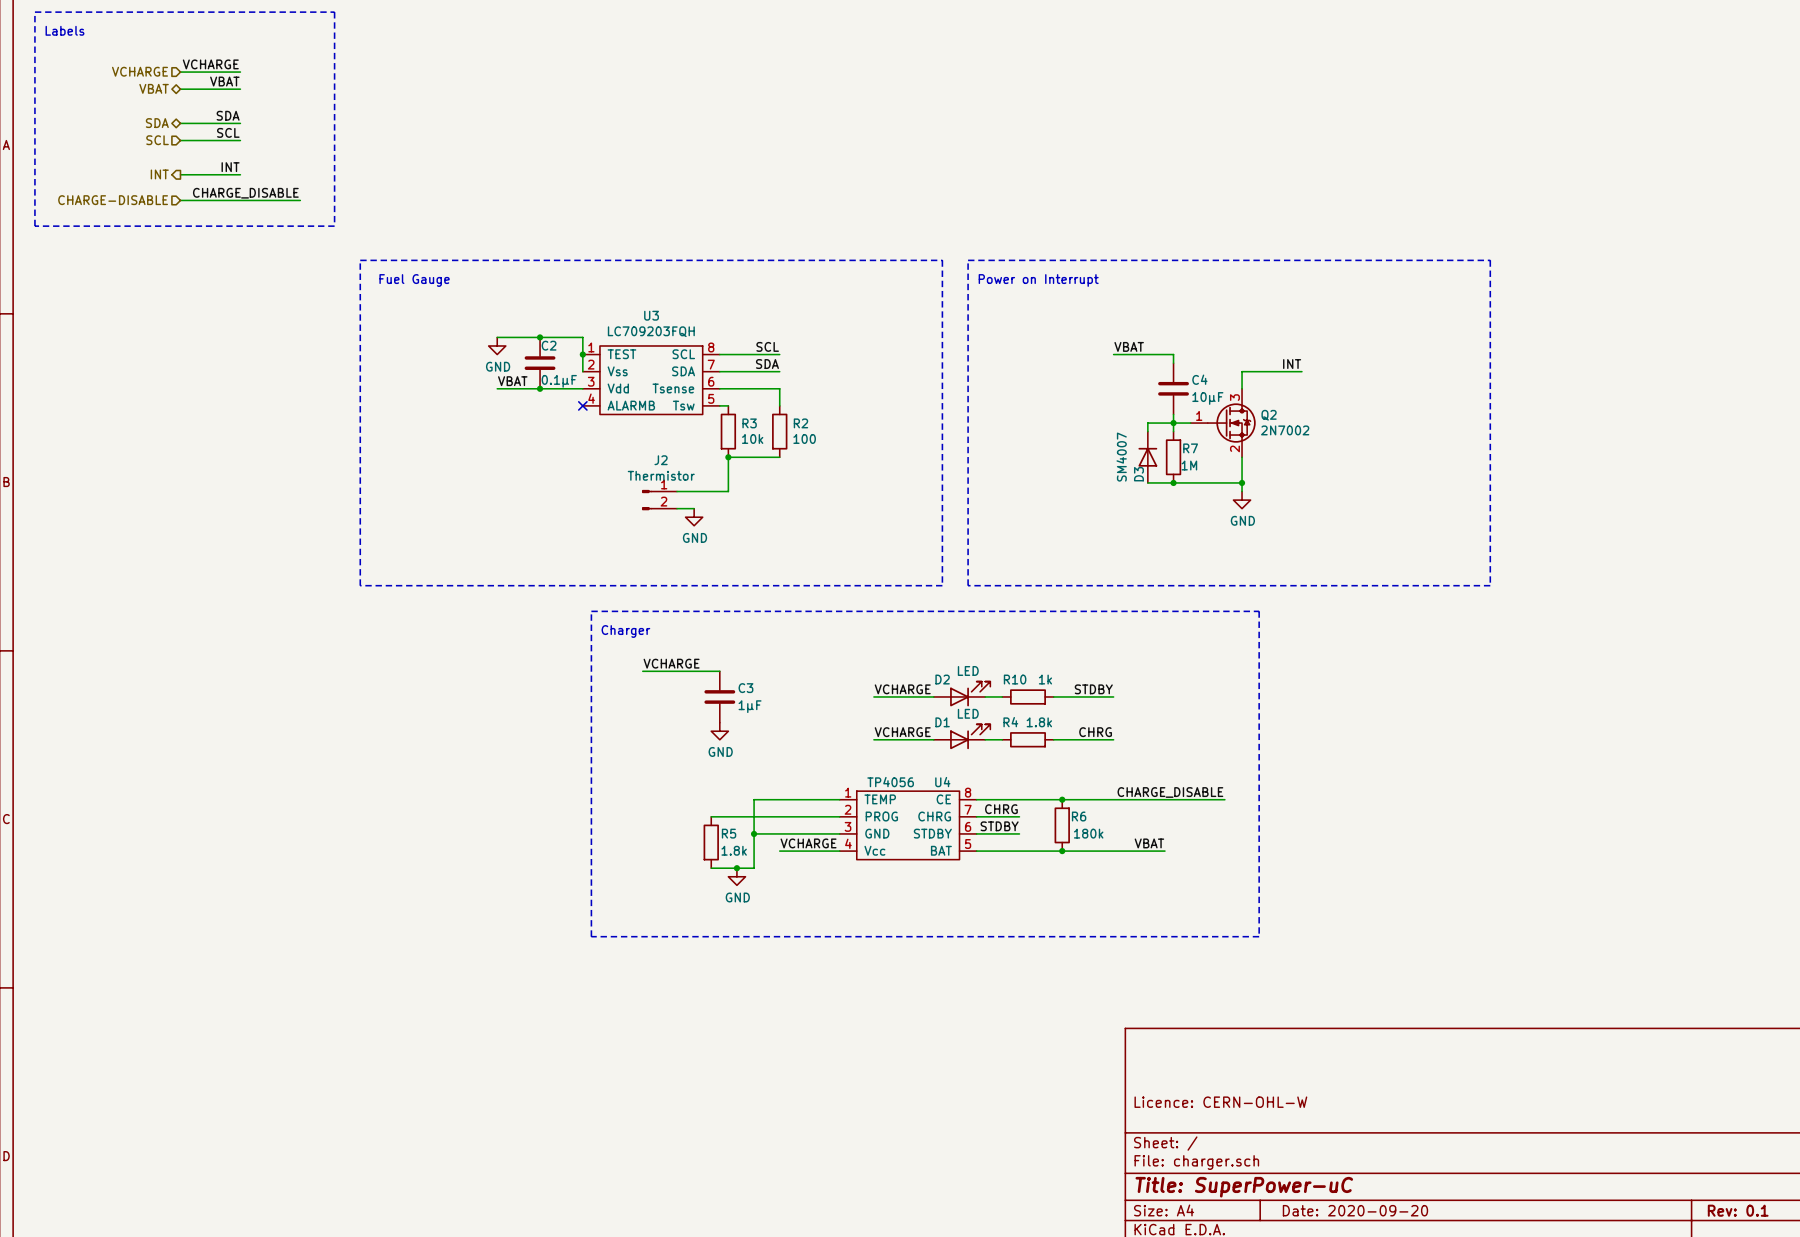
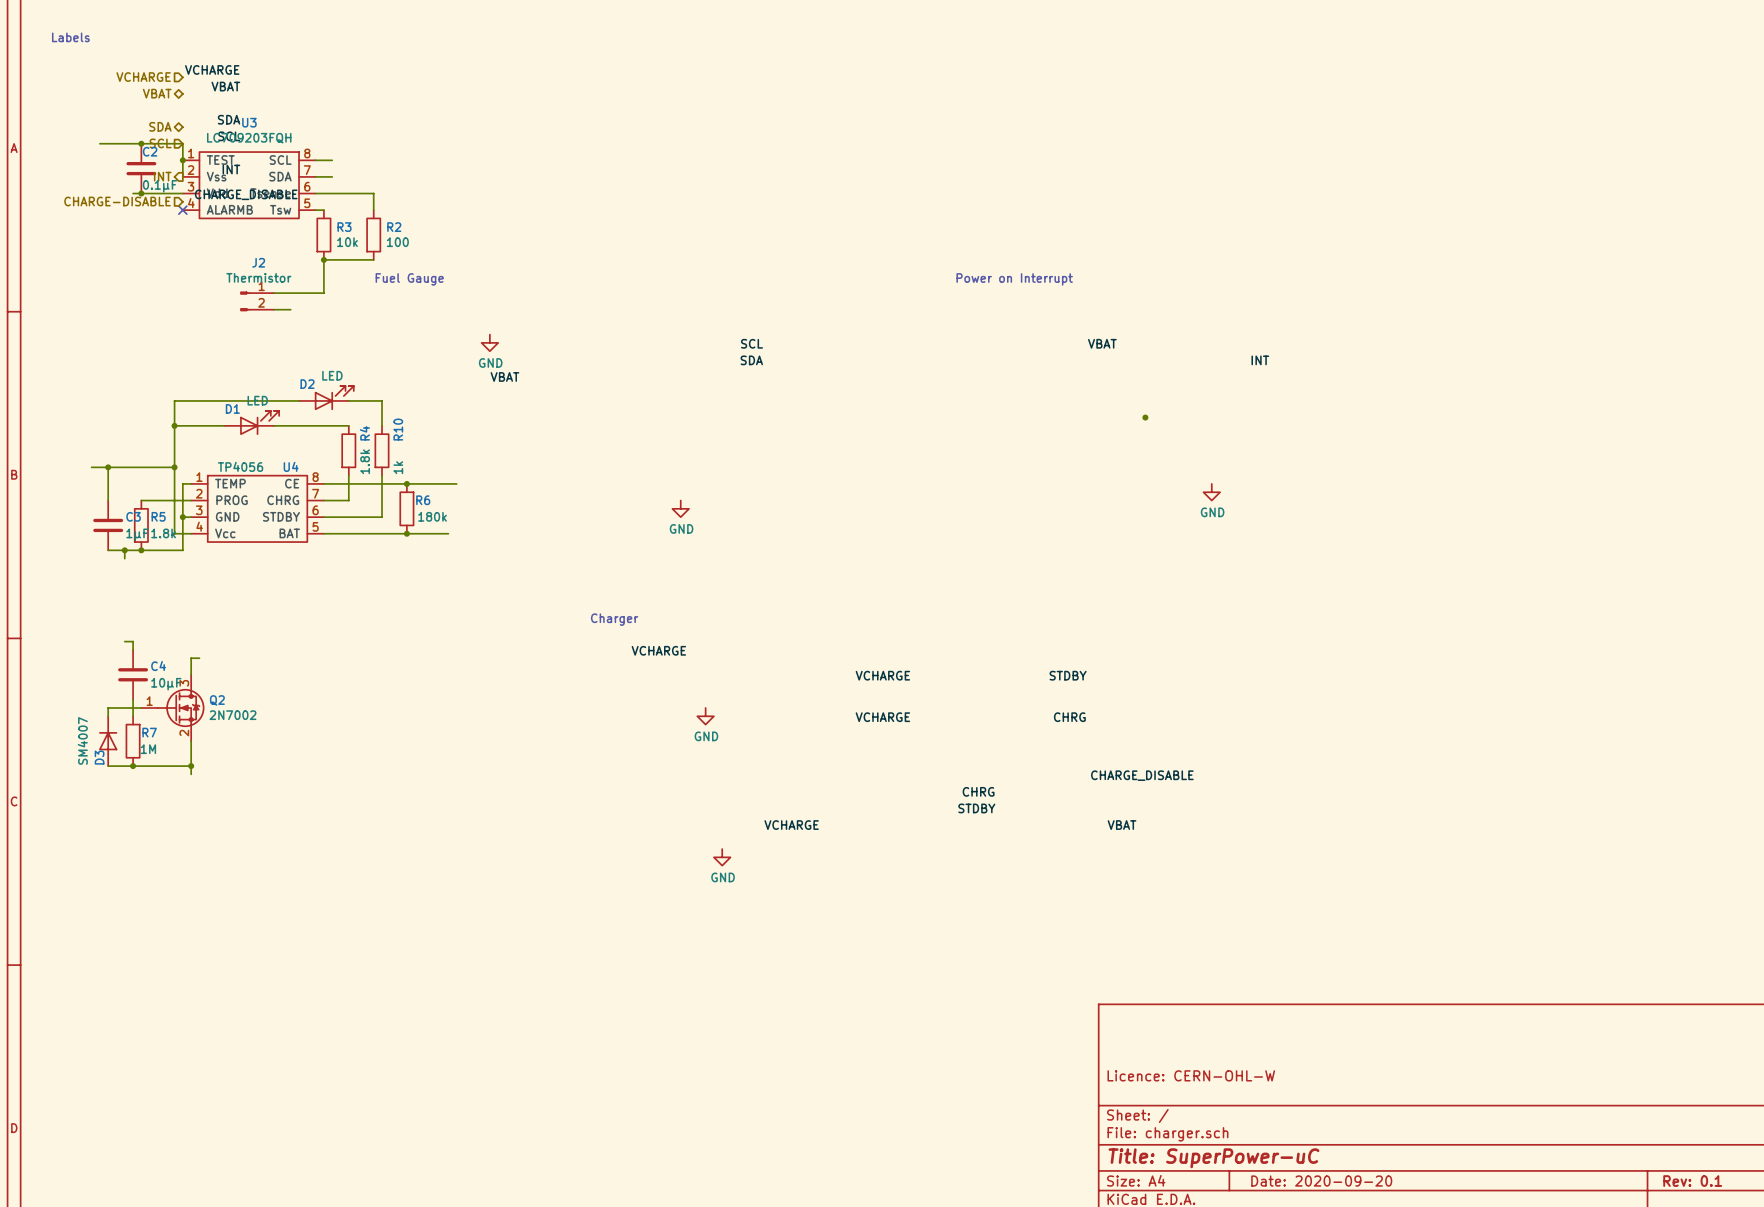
line: (34, 12) (334, 12) (334, 226) (34, 226) (34, 12) -> none
wire: (180, 72) (240, 72) -> none
wire: (180, 89) (240, 89) -> none
wire: (180, 123) (240, 123) -> none
junction: none -> (141, 143)
wire: (180, 140) (240, 140) -> none
junction: none -> (182, 160)
wire: none -> (315, 160) (332, 160)
wire: (180, 174) (240, 174) -> (182, 176) (182, 143) (99, 143)
wire: none -> (315, 176) (332, 176)
wire: none -> (133, 193) (182, 193)
junction: none -> (141, 193)
wire: none -> (315, 193) (373, 193) (373, 210)
wire: (180, 200) (300, 200) -> none
no-connect mark: none -> (182, 210)
wire: none -> (315, 210) (323, 210)
junction: none -> (323, 259)
line: (360, 260) (942, 260) (942, 585) (360, 585) (360, 260) -> none
wire: none -> (373, 259) (323, 259) (323, 293) (274, 293)
line: (968, 260) (1490, 260) (1490, 585) (968, 585) (968, 260) -> none
wire: none -> (274, 309) (290, 309)
wire: (497, 337) (582, 337) (582, 371) -> none
junction: (540, 337) -> none
junction: (582, 354) -> none
wire: (719, 354) (779, 354) -> none
wire: (1113, 354) (1173, 354) (1173, 363) -> none
C2 position: (540, 363) -> (141, 168)
wire: (719, 371) (779, 371) -> none
wire: (1301, 371) (1242, 371) (1242, 388) -> none
U3 position: (651, 380) -> (249, 185)
wire: (497, 388) (582, 388) -> none
junction: (540, 388) -> none
wire: (719, 388) (779, 388) (779, 405) -> none
C4 position: (1173, 388) -> (133, 674)
wire: none -> (299, 400) (174, 400) (174, 533) (191, 533)
wire: none -> (348, 400) (382, 400) (382, 425)
no-connect mark: (582, 405) -> none
wire: (719, 405) (728, 405) -> none
wire: (1173, 414) (1173, 431) -> none
wire: (1190, 423) (1147, 423) (1147, 431) -> none
Q2 position: (1223, 423) -> (172, 707)
wire: none -> (174, 425) (224, 425)
junction: none -> (174, 425)
wire: none -> (274, 425) (348, 425)
R3 position: (728, 431) -> (323, 235)
R2 position: (779, 431) -> (373, 235)
junction: (728, 457) -> none
wire: (779, 457) (728, 457) (728, 491) (677, 491) -> none
D3 position: (1147, 457) -> (108, 741)
R7 position: (1173, 457) -> (133, 741)
wire: (1242, 457) (1242, 491) -> none
wire: none -> (91, 467) (174, 467)
wire: none -> (108, 467) (108, 500)
junction: none -> (108, 467)
junction: none -> (174, 467)
wire: none -> (348, 475) (348, 500) (323, 500)
wire: none -> (382, 475) (382, 517) (323, 517)
wire: (1147, 482) (1242, 482) -> none
junction: (1173, 482) -> none
junction: (1242, 482) -> none
wire: none -> (191, 483) (182, 483) (182, 550) (108, 550)
wire: none -> (323, 483) (456, 483)
junction: none -> (406, 483)
J2 position: (659, 500) -> (257, 301)
wire: none -> (141, 500) (191, 500)
wire: (677, 508) (694, 508) -> none
wire: none -> (182, 517) (191, 517)
junction: none -> (182, 517)
wire: none -> (323, 533) (448, 533)
junction: none -> (406, 533)
wire: none -> (124, 550) (124, 558)
junction: none -> (124, 550)
junction: none -> (141, 550)
line: (591, 611) (591, 936) (1259, 936) (1259, 611) (591, 611) -> none
wire: none -> (124, 641) (133, 641) (133, 649)
wire: none -> (199, 658) (191, 658) (191, 674)
wire: (642, 671) (719, 671) -> none
D2 position: (962, 693) -> (326, 398)
C3 position: (719, 696) -> (108, 525)
wire: (873, 696) (933, 696) -> none
wire: (985, 696) (1002, 696) -> none
R10 rotation: 0° (1028, 696) -> 90° clockwise (382, 450)
R10 position: (1028, 696) -> (382, 450)
wire: (1053, 696) (1113, 696) -> none
wire: none -> (133, 699) (133, 716)
wire: none -> (141, 707) (108, 707) (108, 716)
D1 position: (962, 736) -> (251, 422)
wire: (873, 739) (933, 739) -> none
wire: (985, 739) (1002, 739) -> none
R4 rotation: 0° (1028, 739) -> 90° clockwise (348, 450)
R4 position: (1028, 739) -> (348, 450)
wire: (1053, 739) (1113, 739) -> none
wire: none -> (191, 741) (191, 774)
wire: none -> (108, 766) (191, 766)
junction: none -> (133, 766)
junction: none -> (191, 766)
wire: (839, 799) (754, 799) (754, 868) (711, 868) -> none
wire: (976, 799) (1224, 799) -> none
junction: (1062, 799) -> none
wire: (711, 816) (839, 816) -> none
wire: (976, 816) (1019, 816) -> none
U4 position: (908, 825) -> (257, 508)
R6 position: (1062, 825) -> (406, 508)
wire: (754, 833) (839, 833) -> none
junction: (754, 833) -> none
wire: (976, 833) (1019, 833) -> none
R5 position: (711, 842) -> (141, 525)
wire: (779, 851) (839, 851) -> none
wire: (976, 851) (1164, 851) -> none
junction: (1062, 851) -> none
junction: (736, 868) -> none

